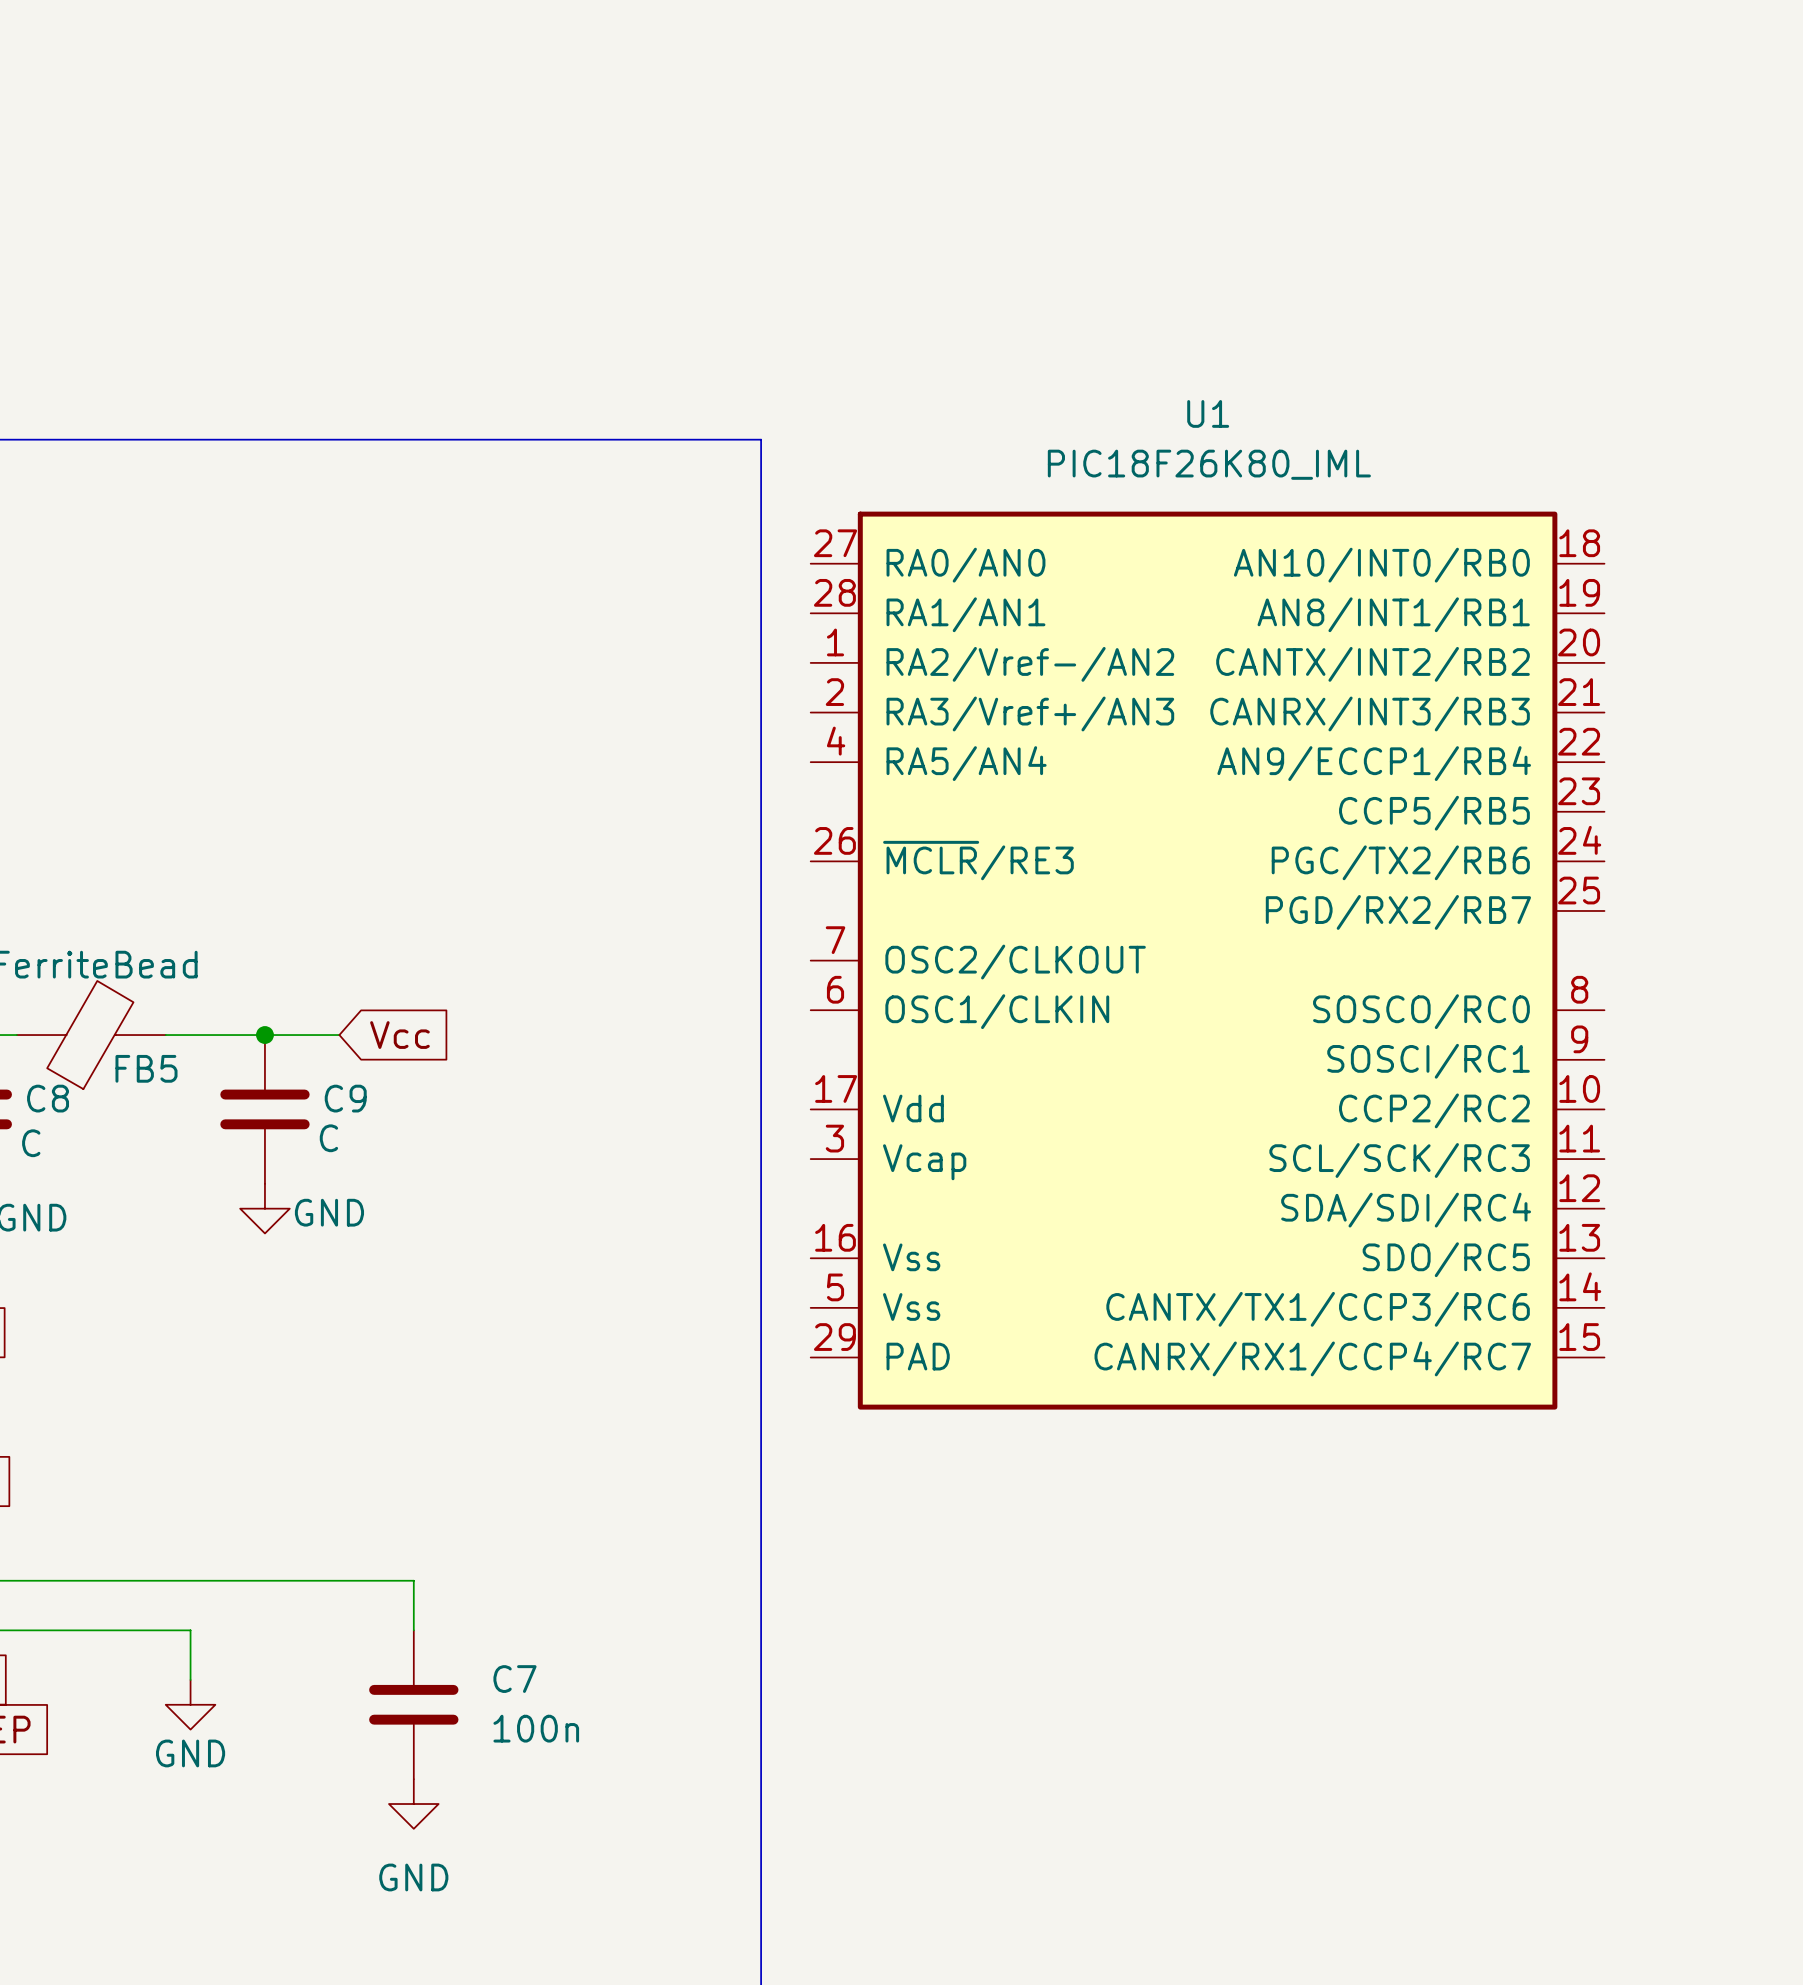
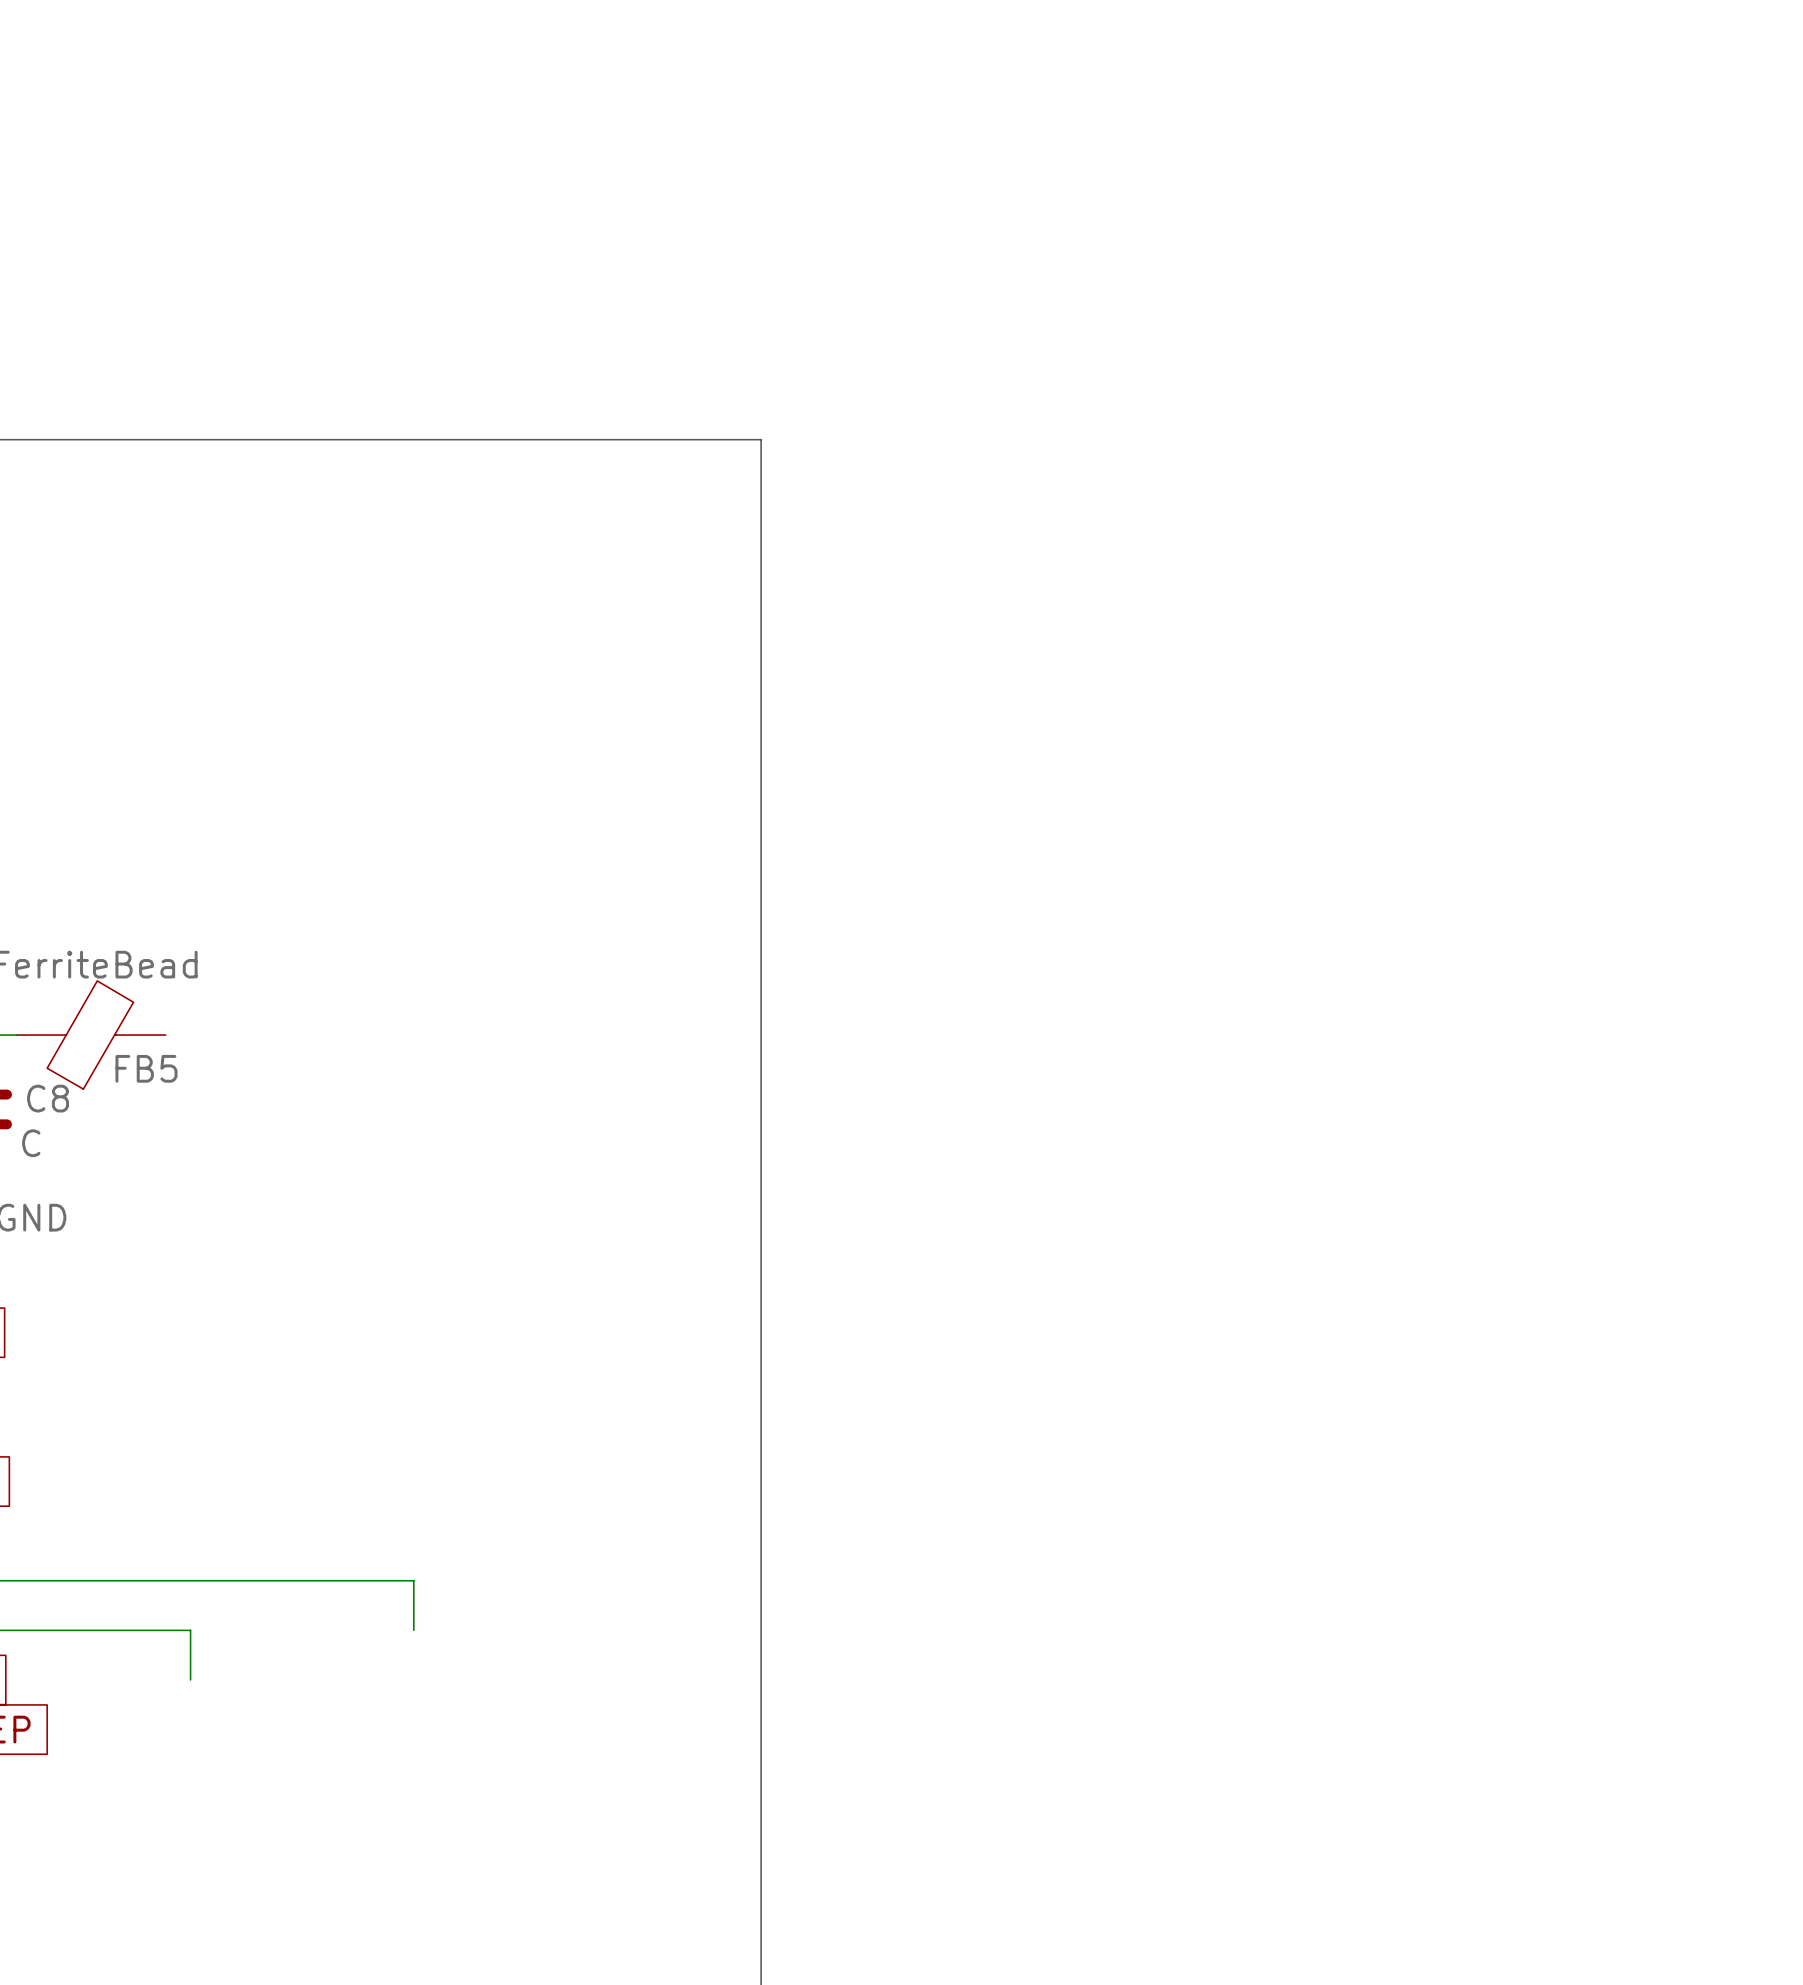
U1: PIC18F26K80_IML (1207, 960) -> none
wire: (165, 1035) (339, 1035) -> none
junction: (264, 1035) -> none
global label: Vcc (399, 1035) -> none
C9: C (264, 1109) -> none
power symbol: GND (264, 1208) -> none
power symbol: GND (190, 1704) -> none
C7: 100n (413, 1704) -> none
power symbol: GND (413, 1804) -> none

